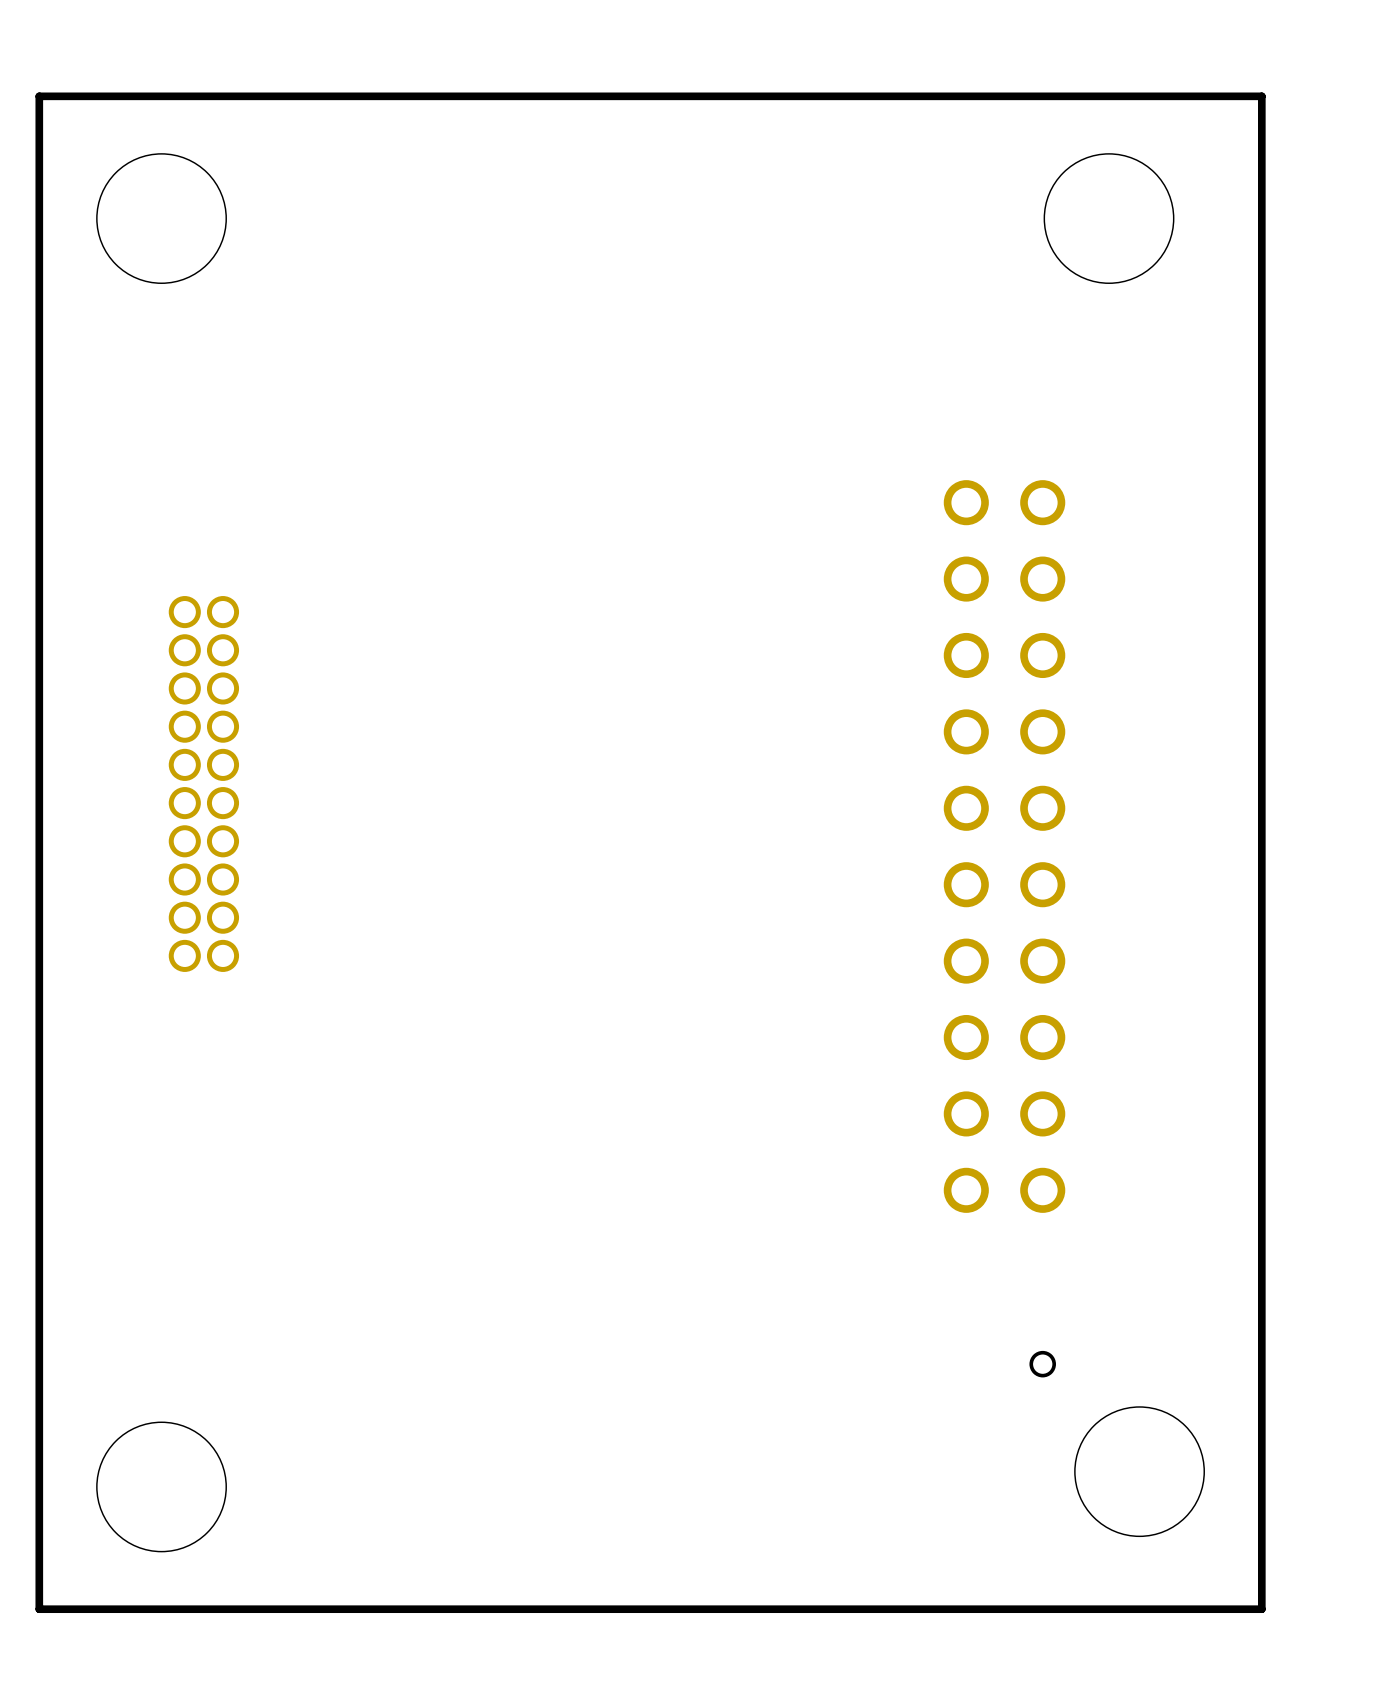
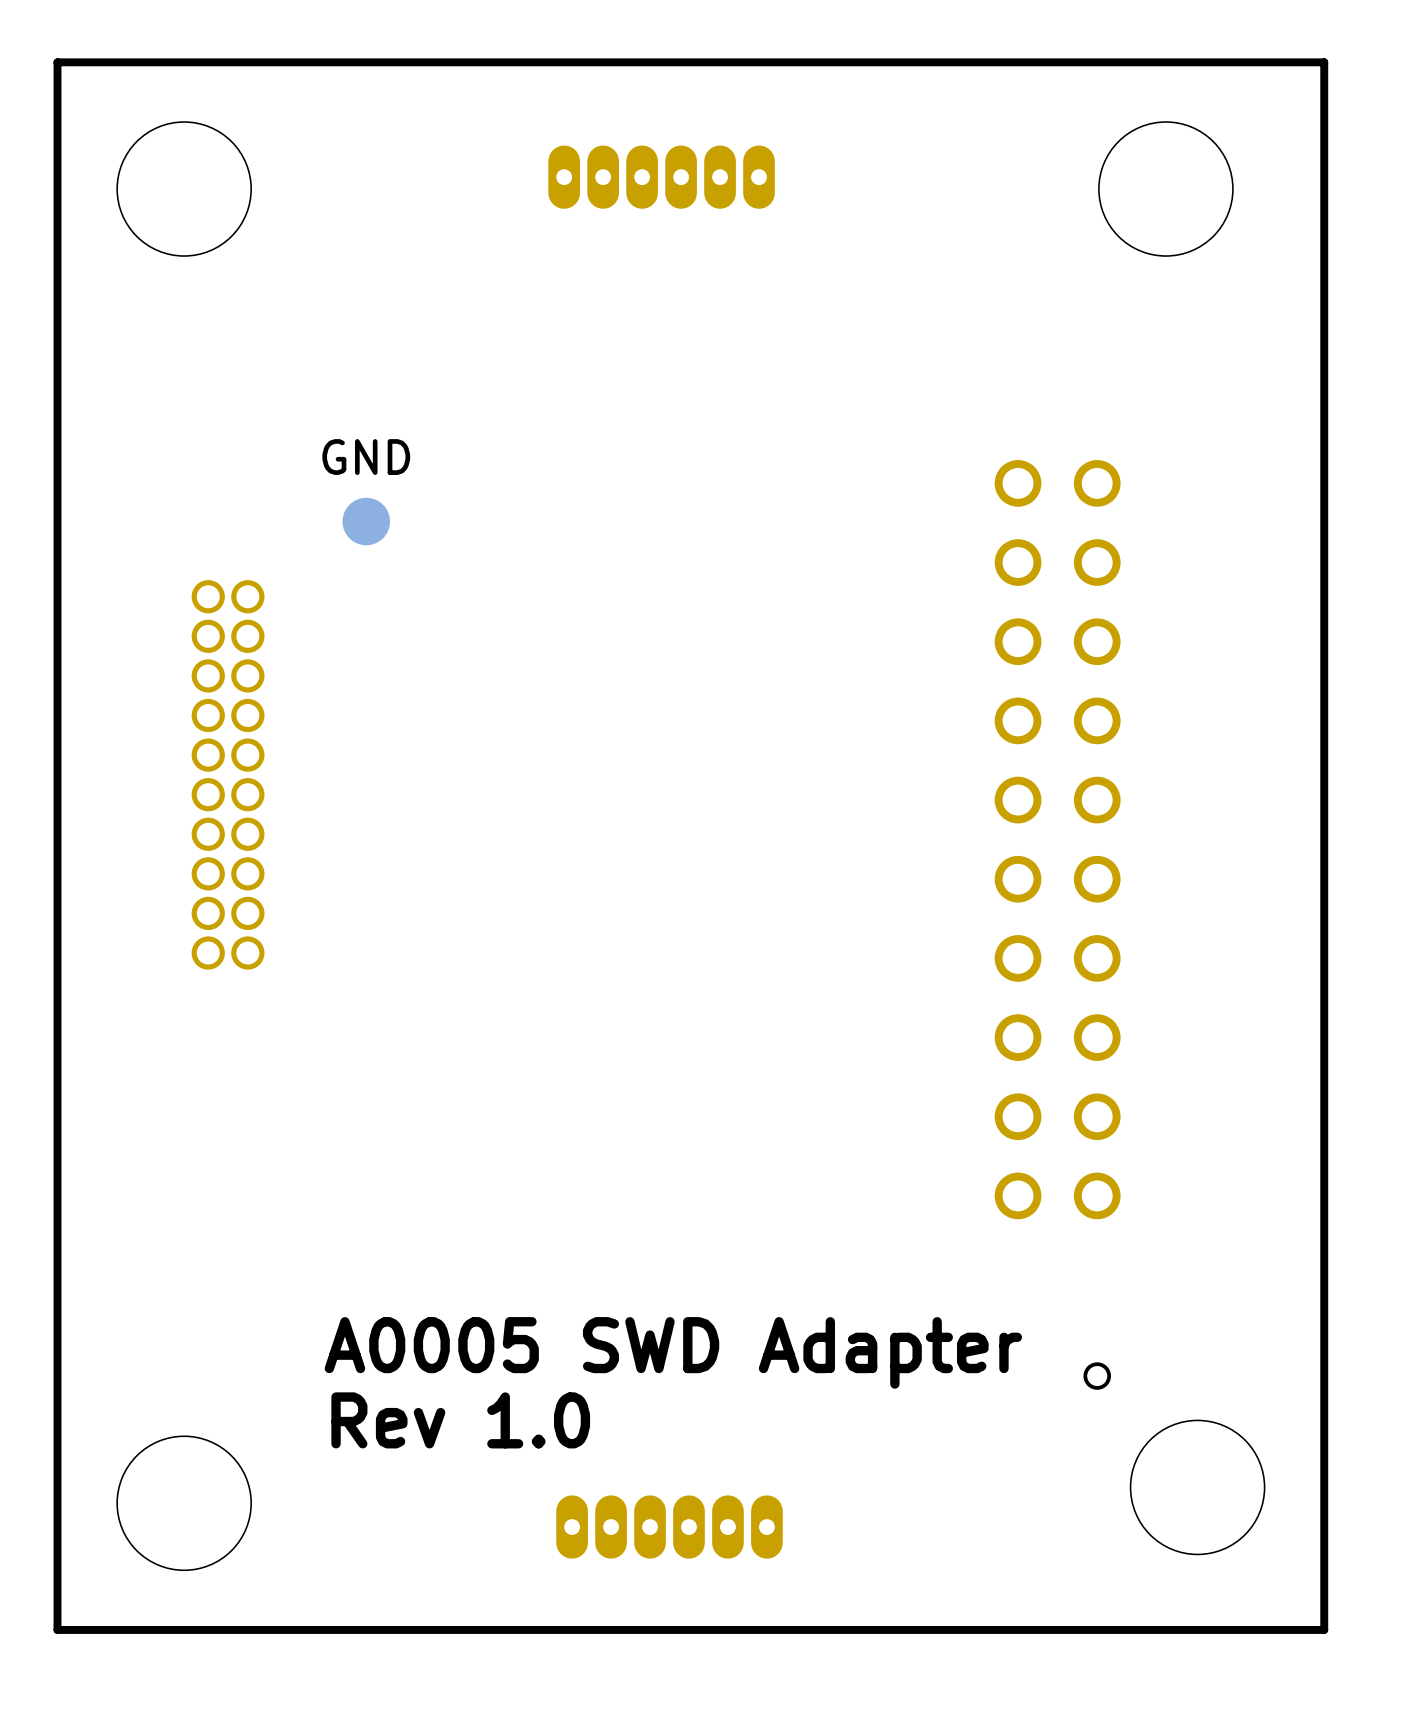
part: none -> (661, 177)
part: none -> GND (366, 521)
text: none -> A0005 SWD Adapter (673, 1352)
text: none -> Rev 1.0 (460, 1420)
part: none -> (669, 1527)

